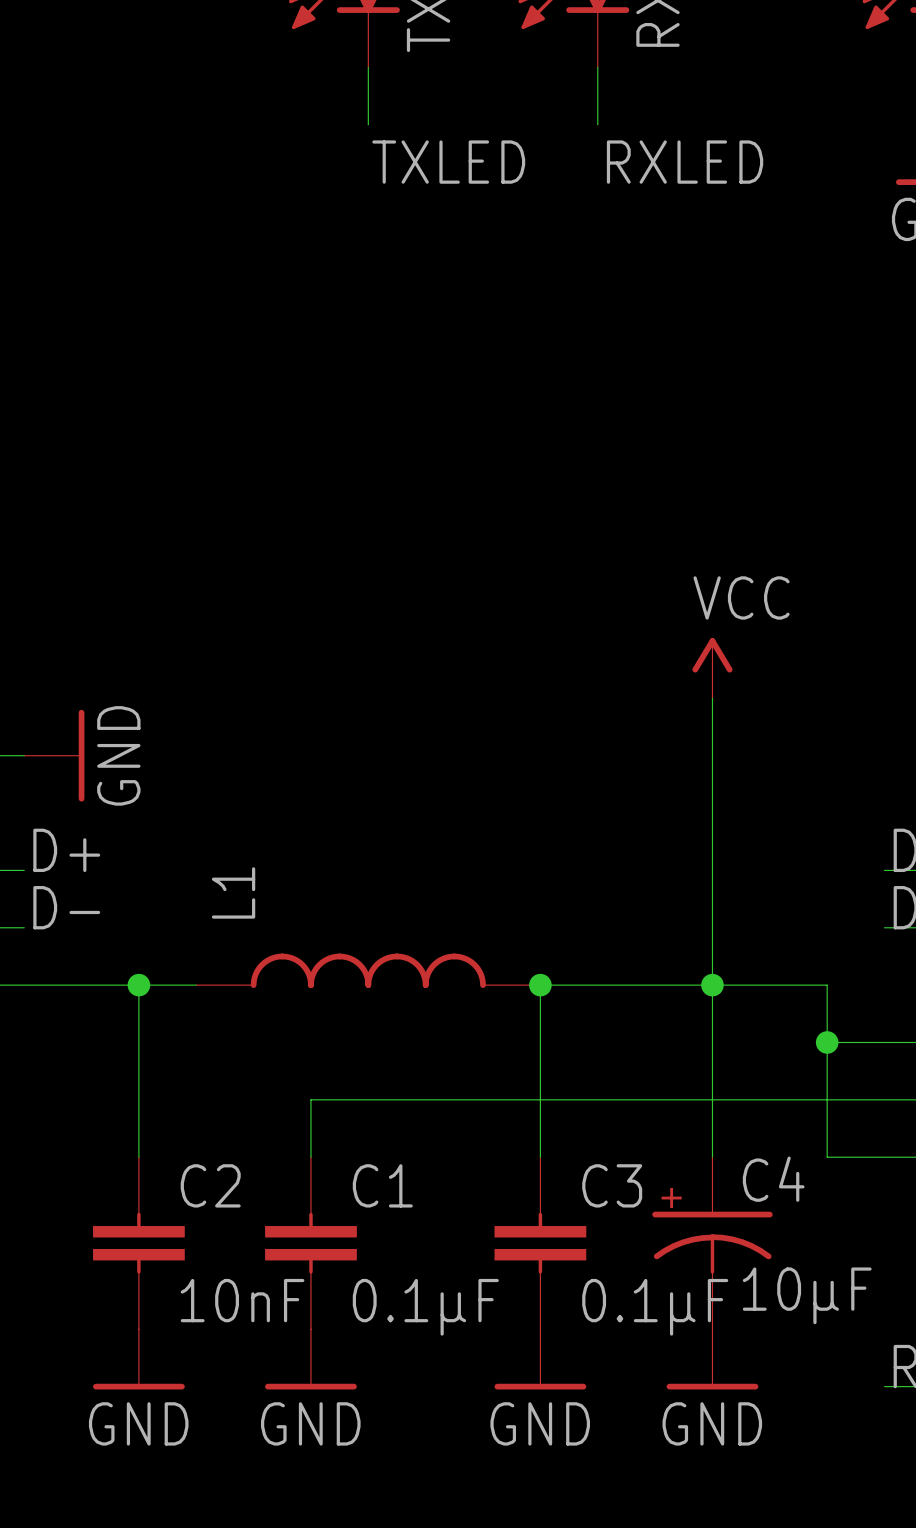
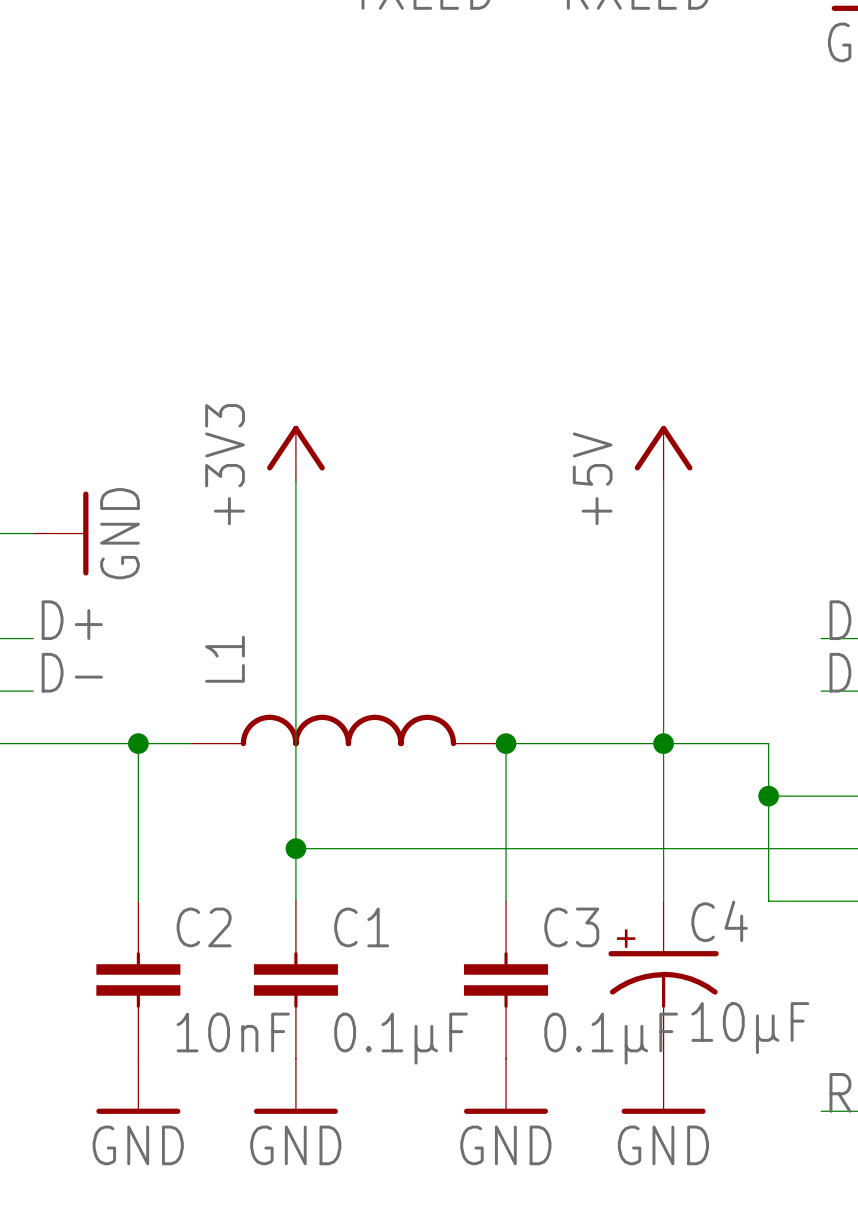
power symbol: none -> +3V3 (295, 453)
power symbol: VCC (712, 668) -> +5V (663, 453)
wire: none -> (295, 481) (295, 848)
junction: none -> (295, 848)

